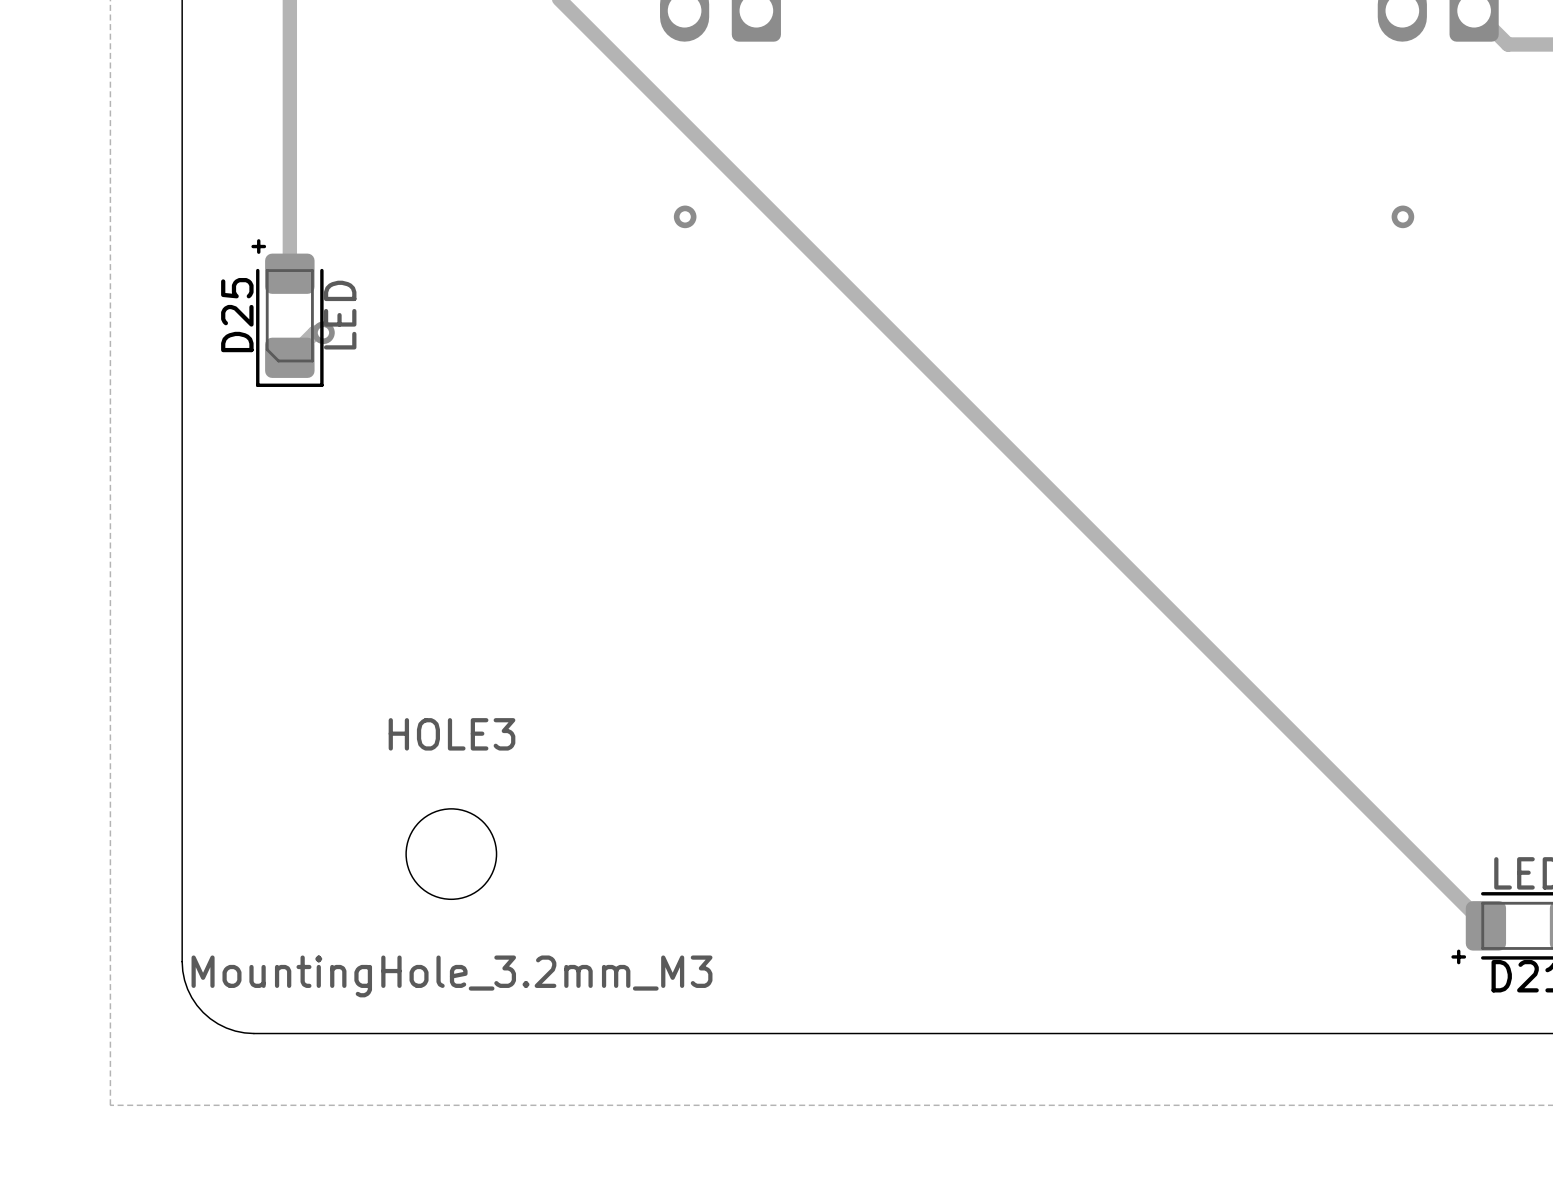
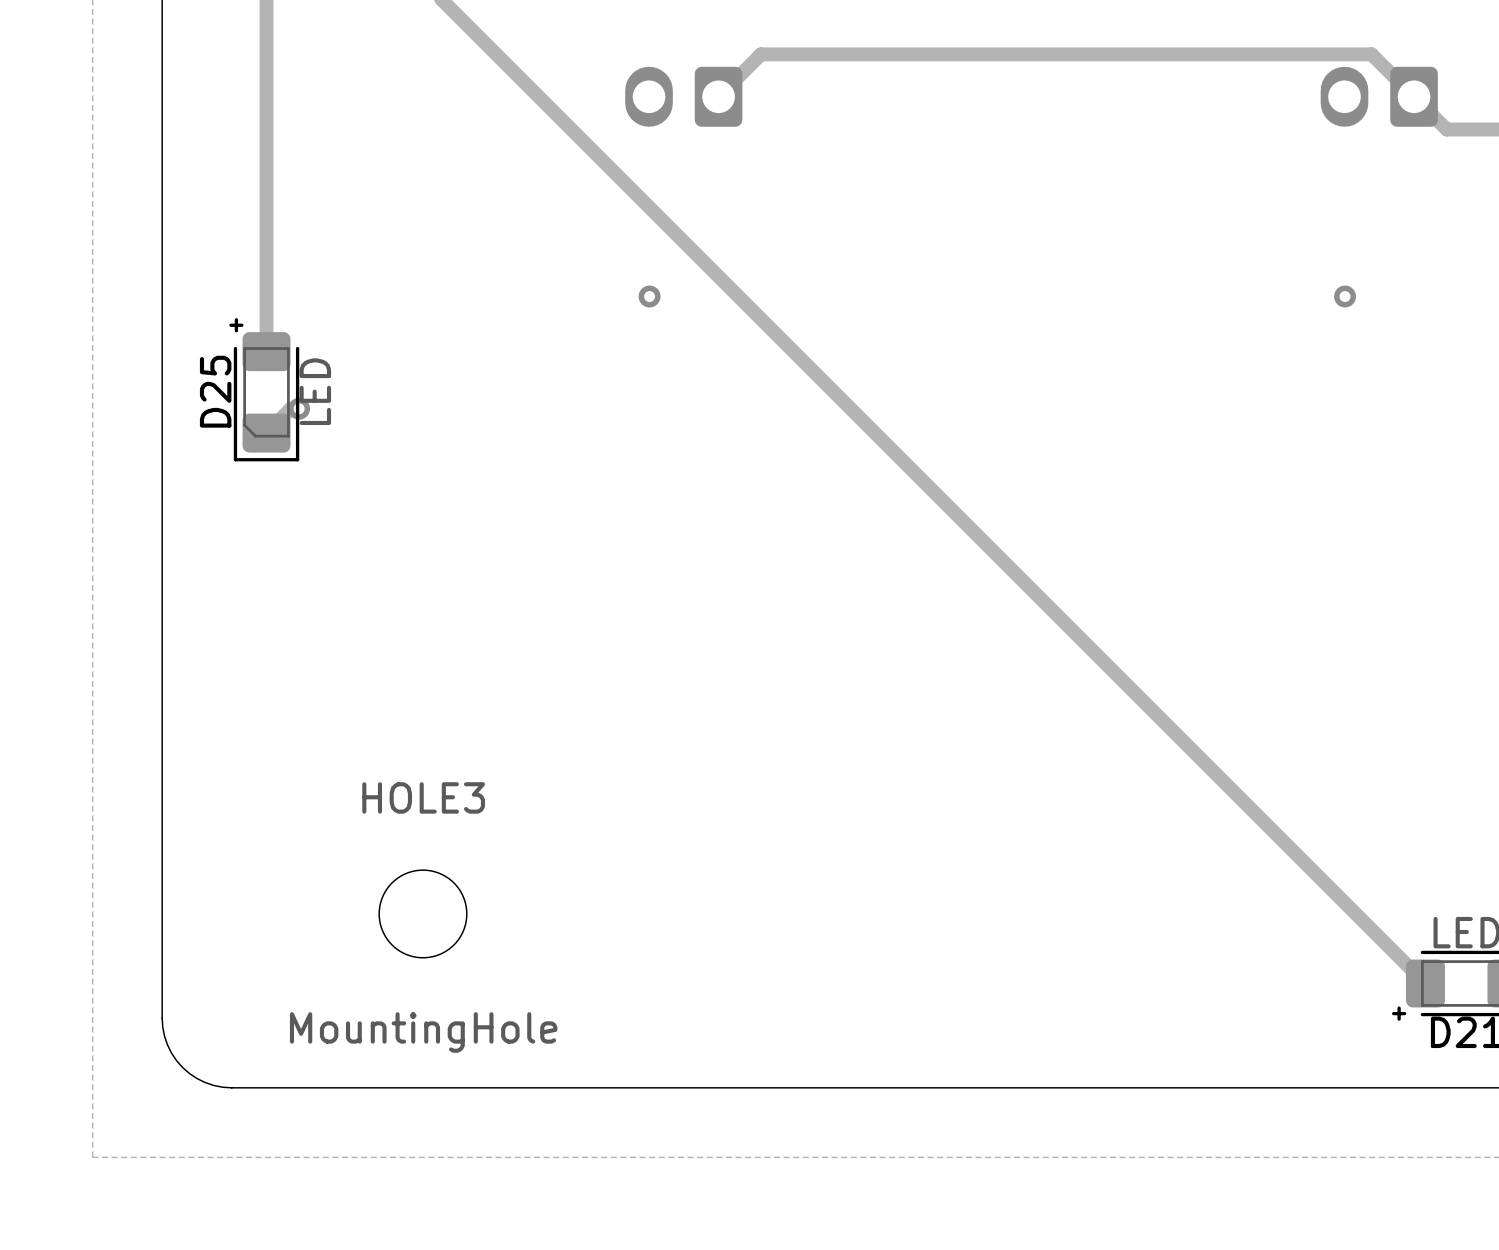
HOLE3 value: MountingHole_3.2mm_M3 (452, 976) -> MountingHole (423, 1032)

